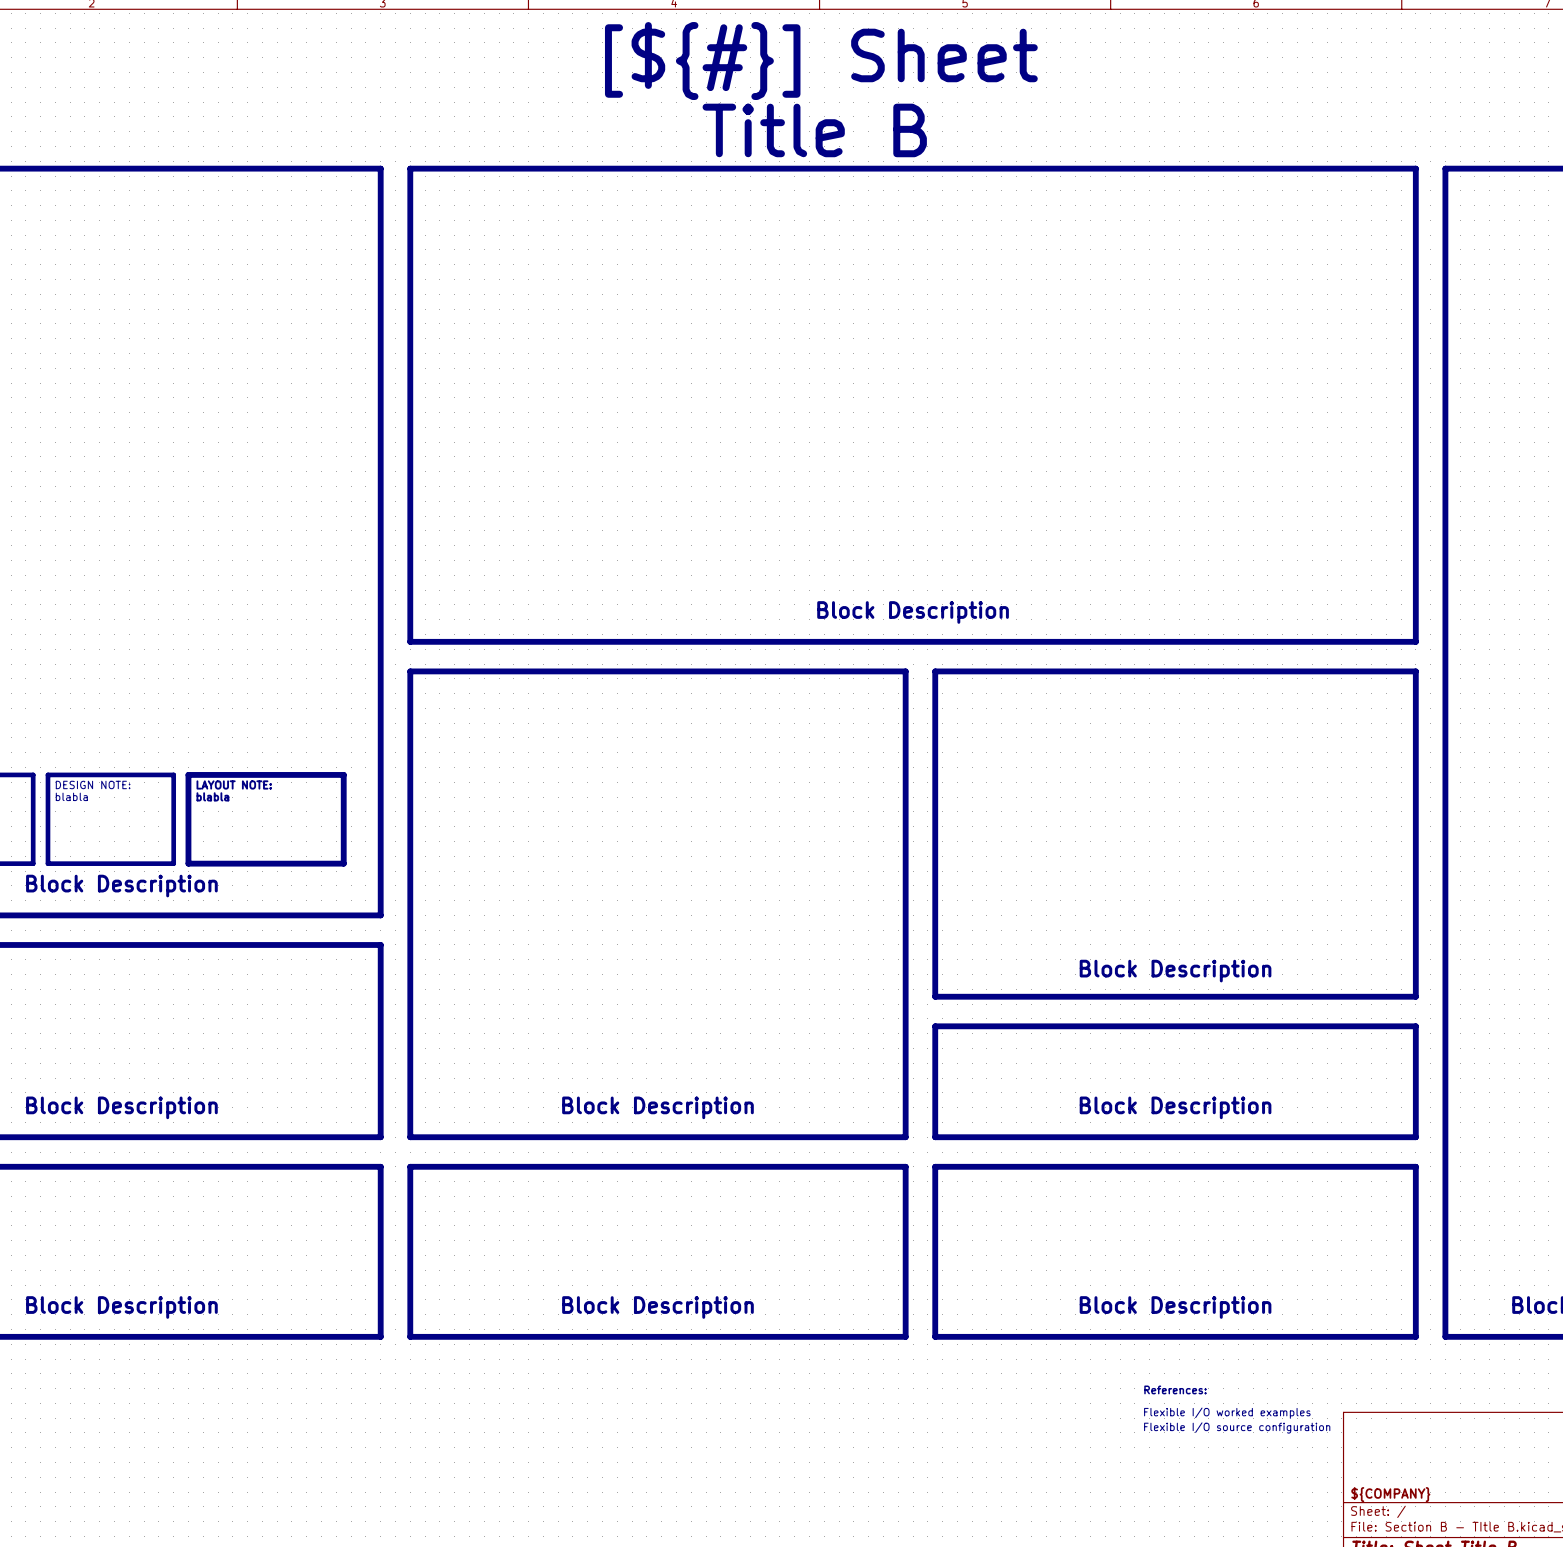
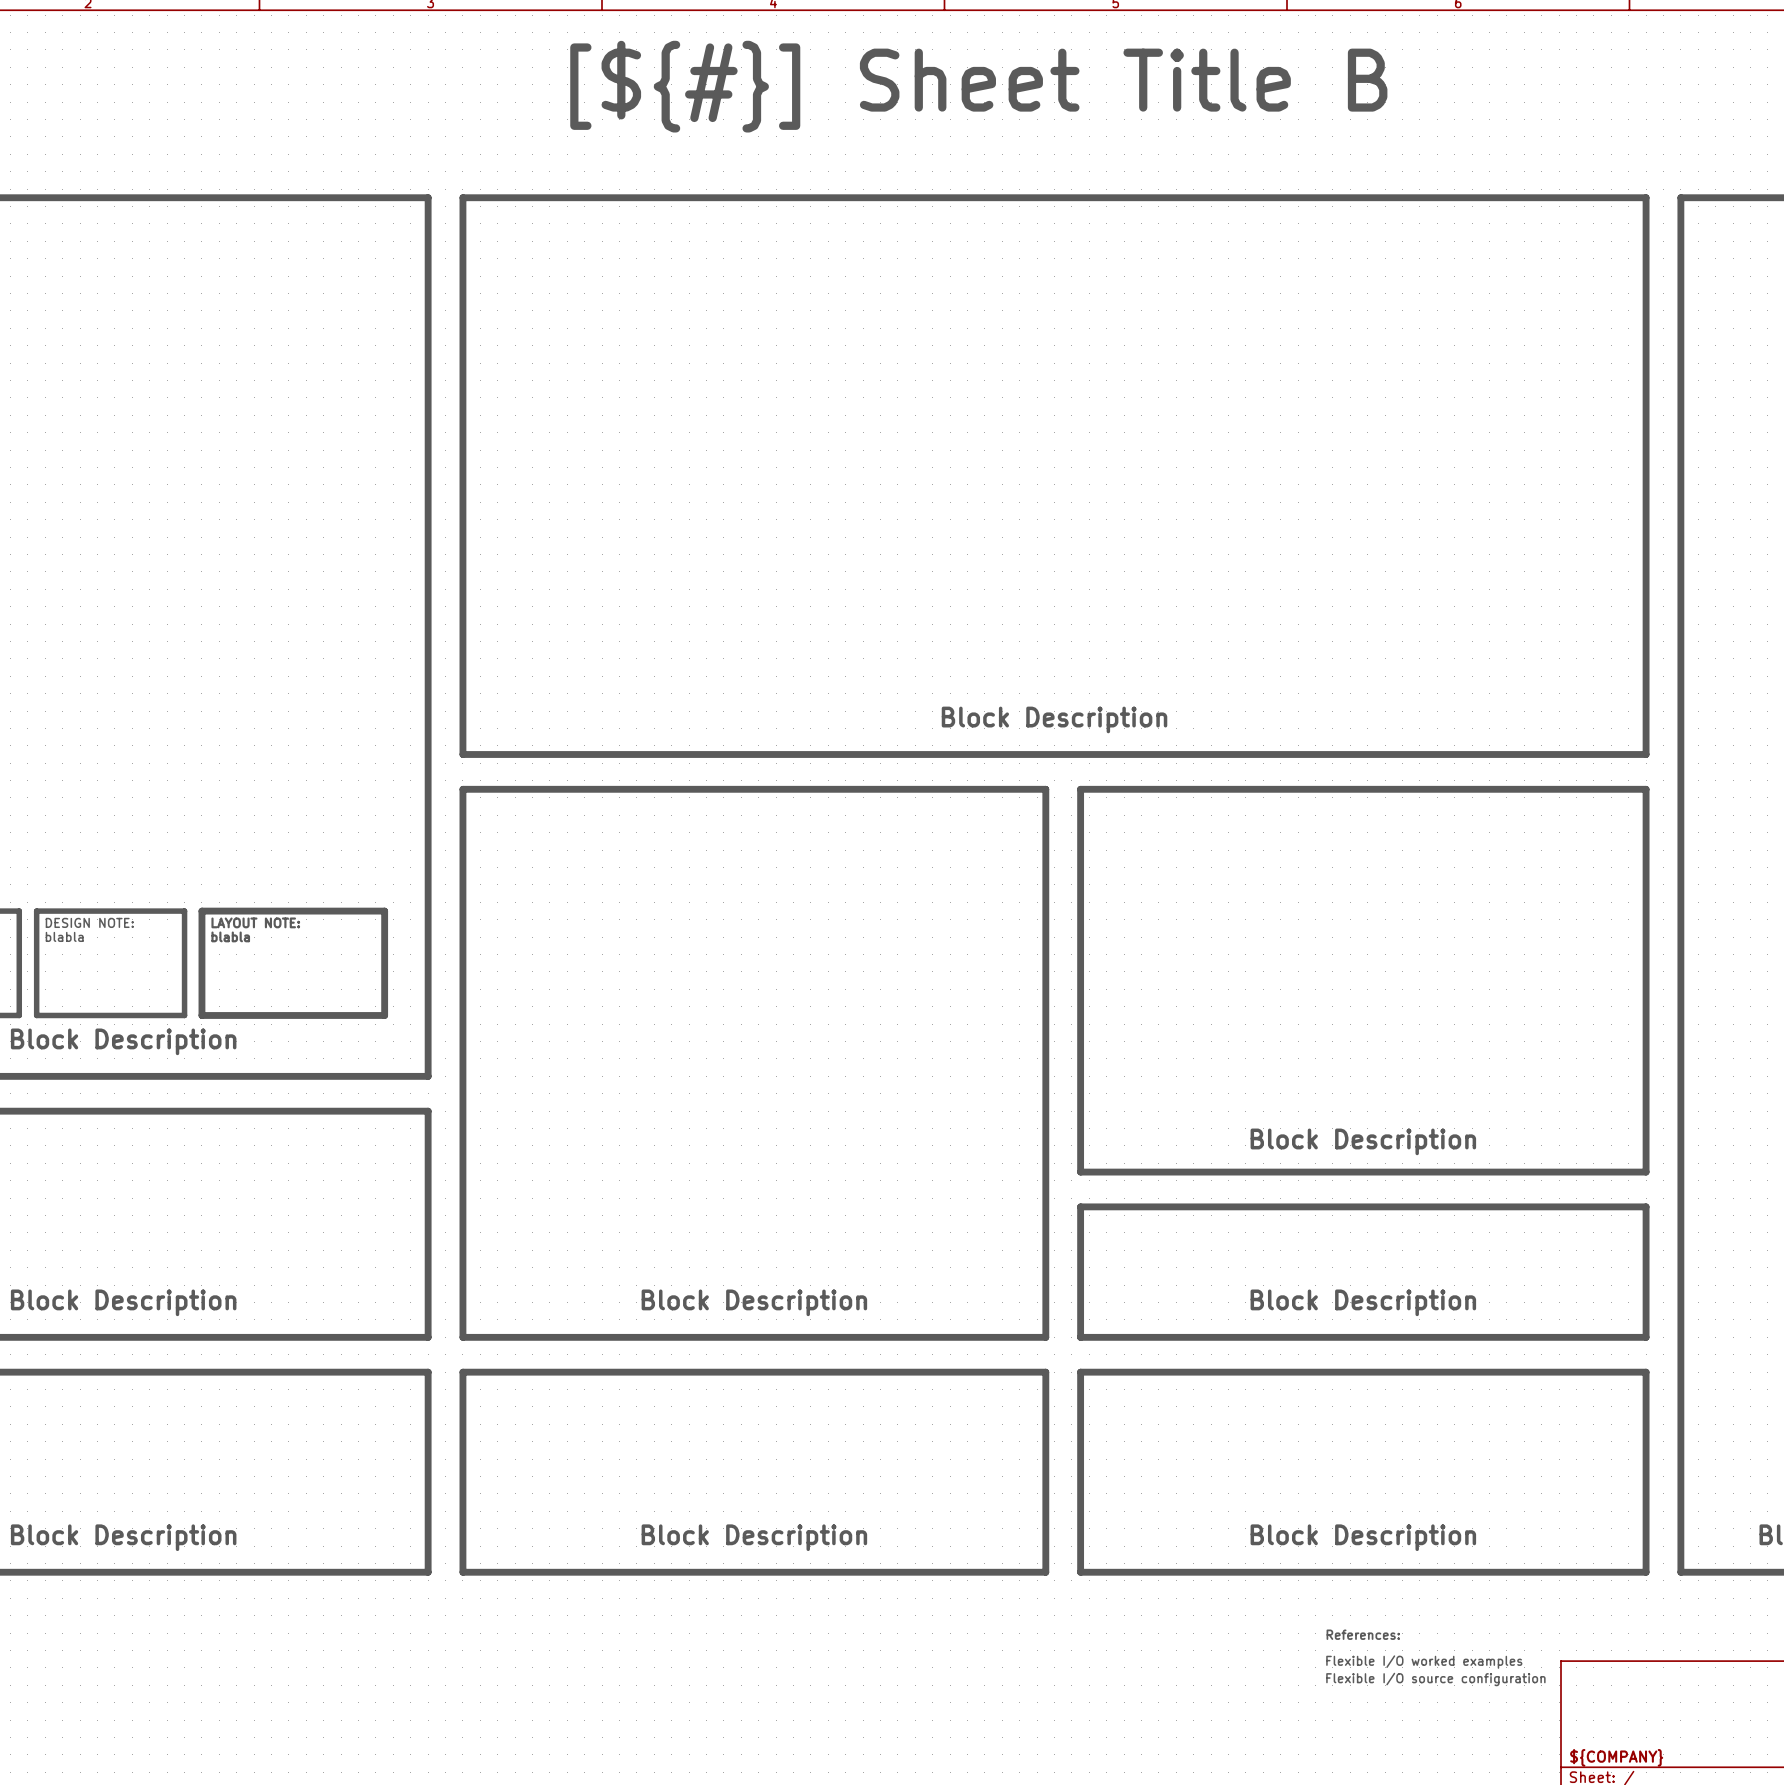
text: [${#}] Sheet (821, 61) -> [${#}] Sheet Title B (978, 86)
text: Title B (814, 130) -> none

